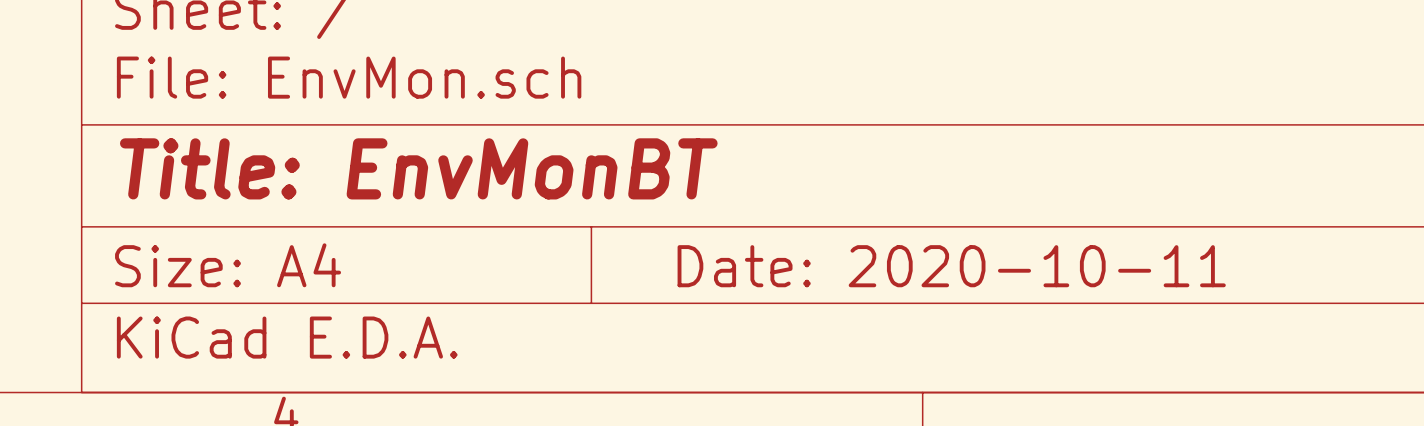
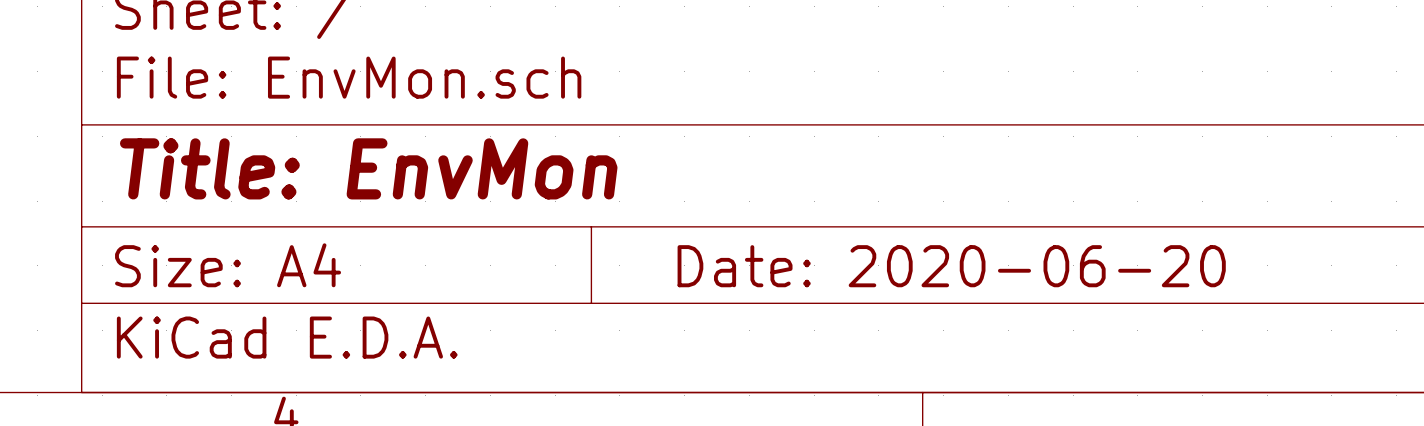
title block: Title: EnvMonBT (418, 168) -> Title: EnvMon (368, 168)
title block: Date: 2020-10-11 (951, 266) -> Date: 2020-06-20 (951, 266)

